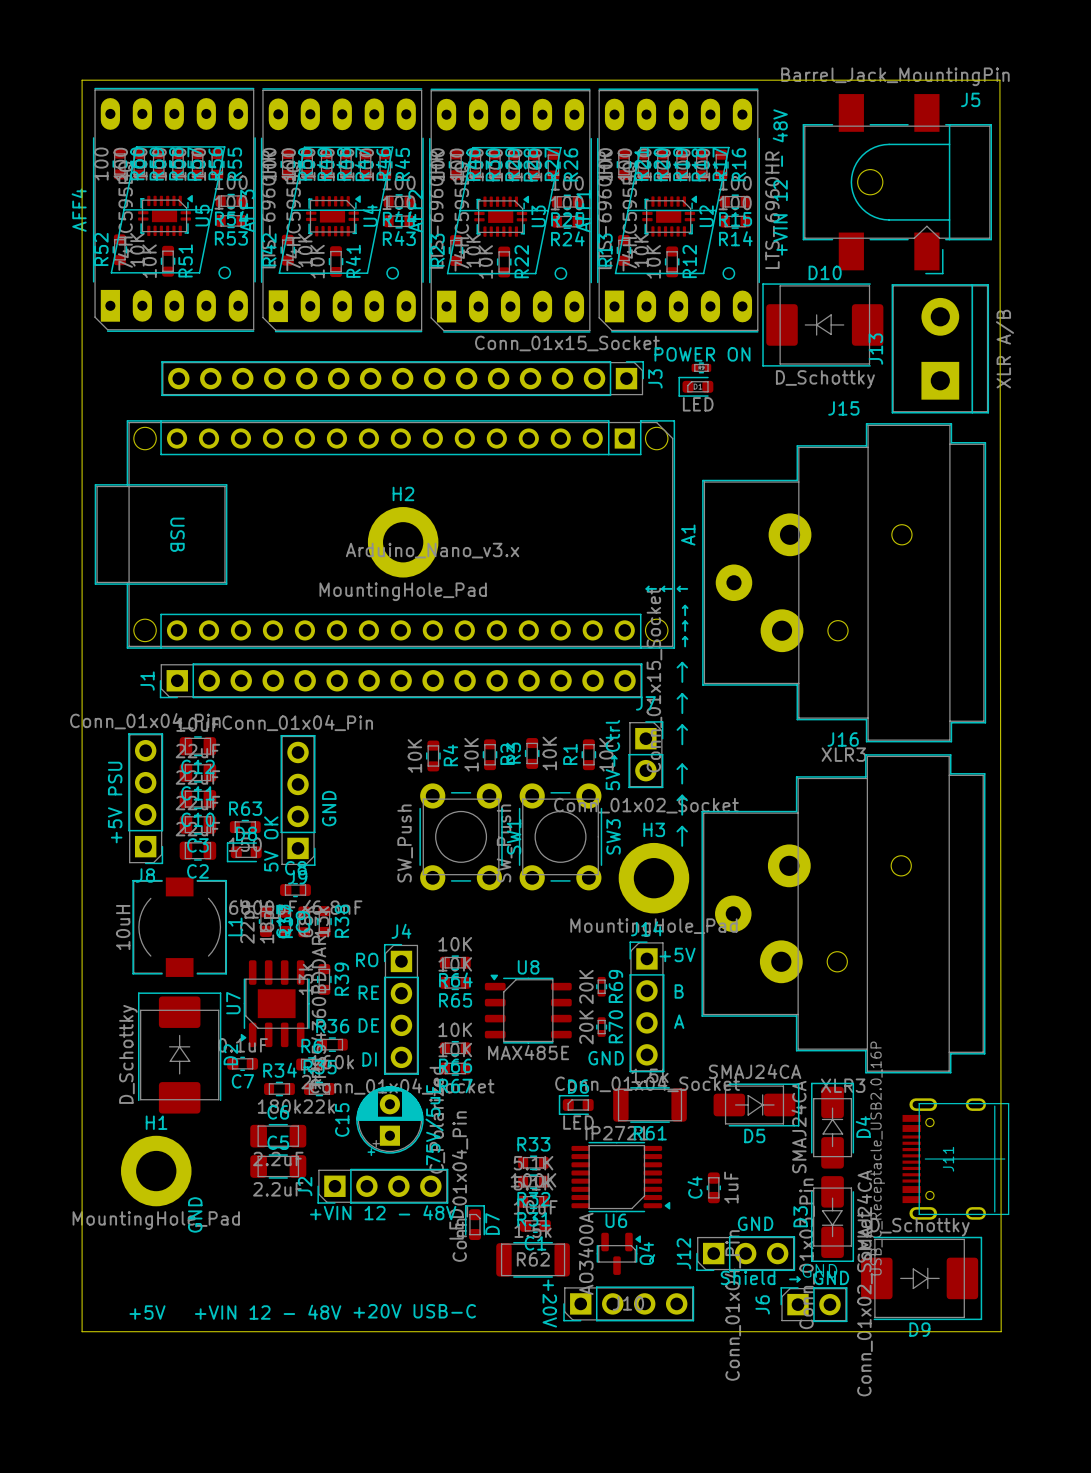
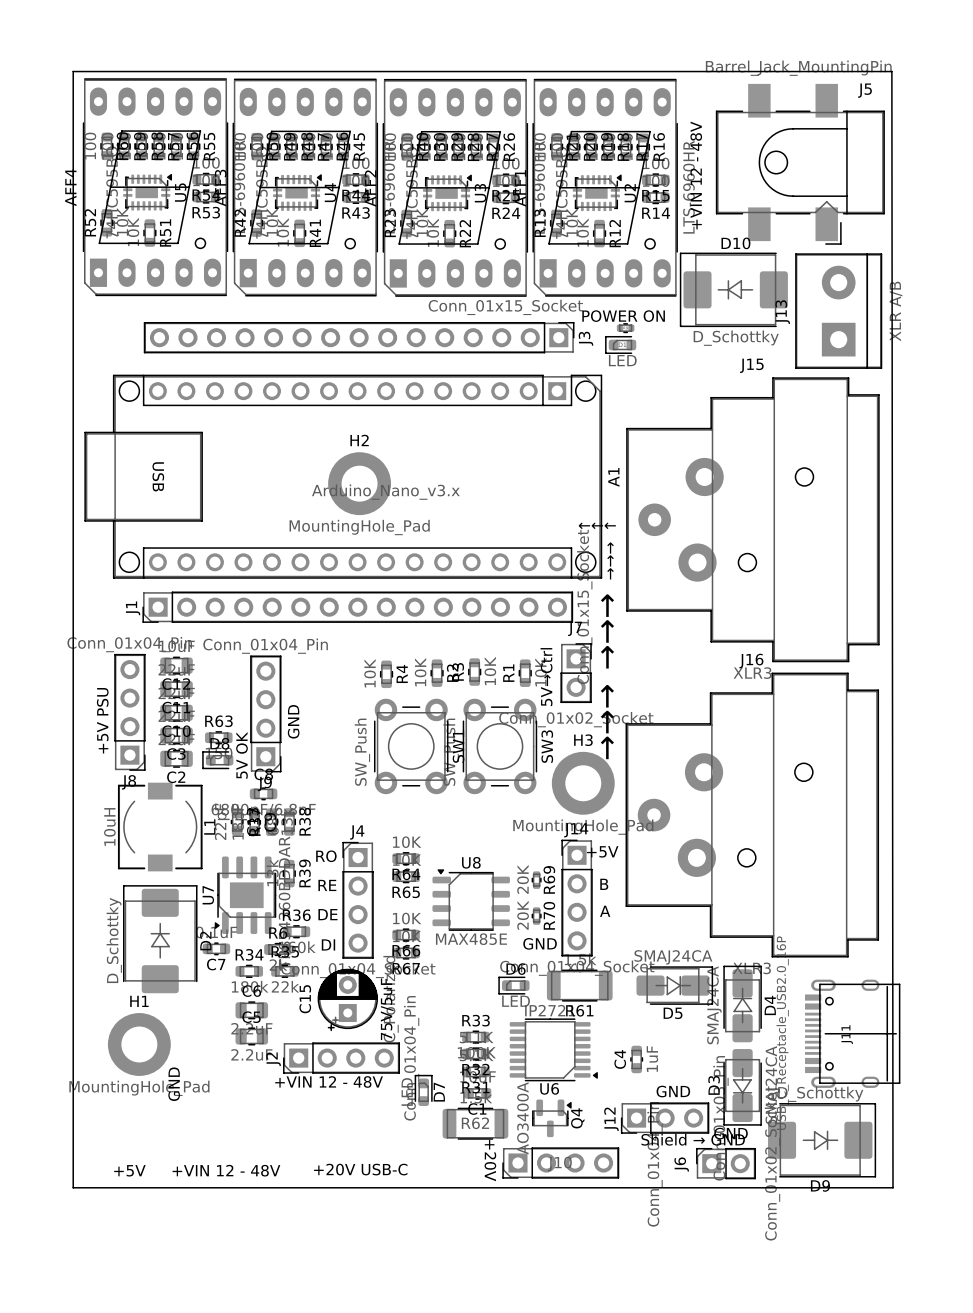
C6 footprint: [250, 1123, 307, 1149] -> [235, 1001, 269, 1020]
C5 footprint: [250, 1154, 307, 1179] -> [235, 1027, 269, 1046]

